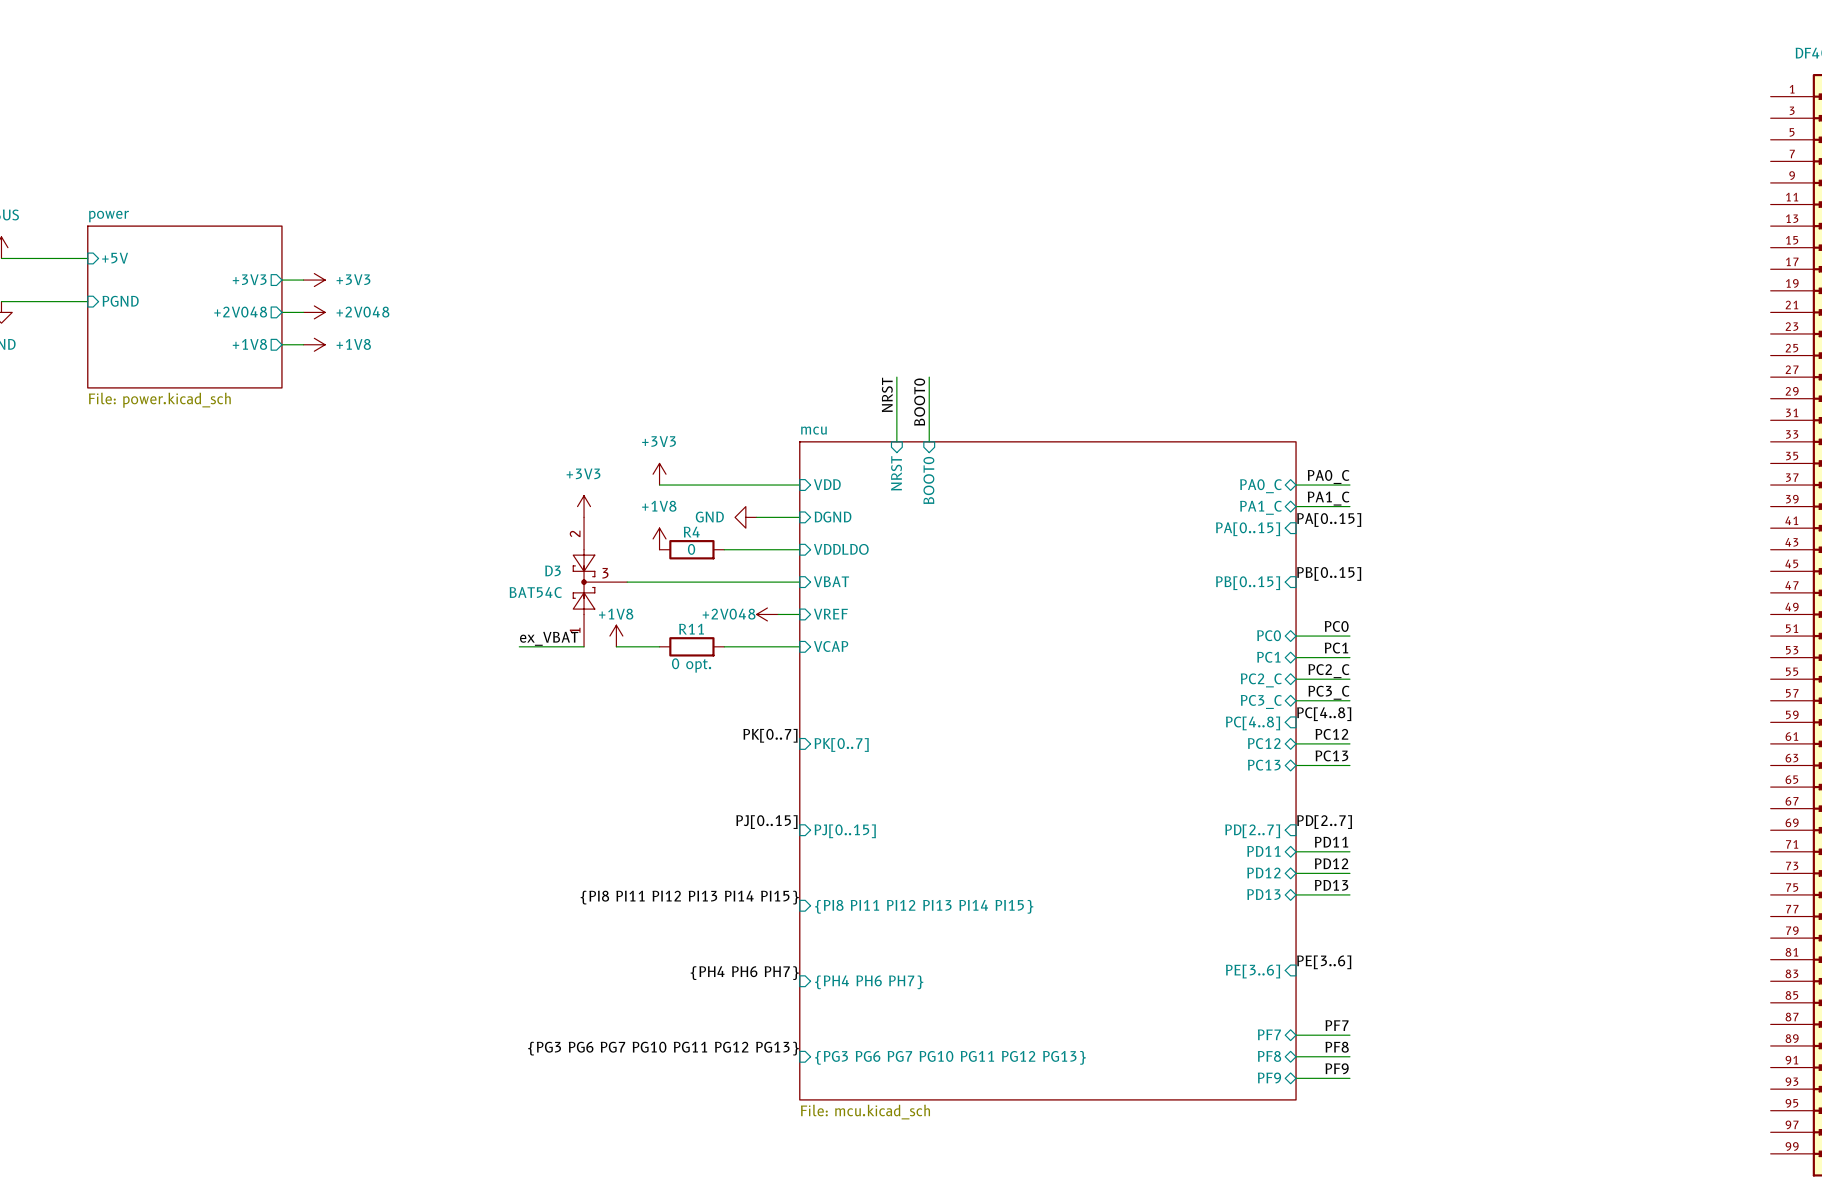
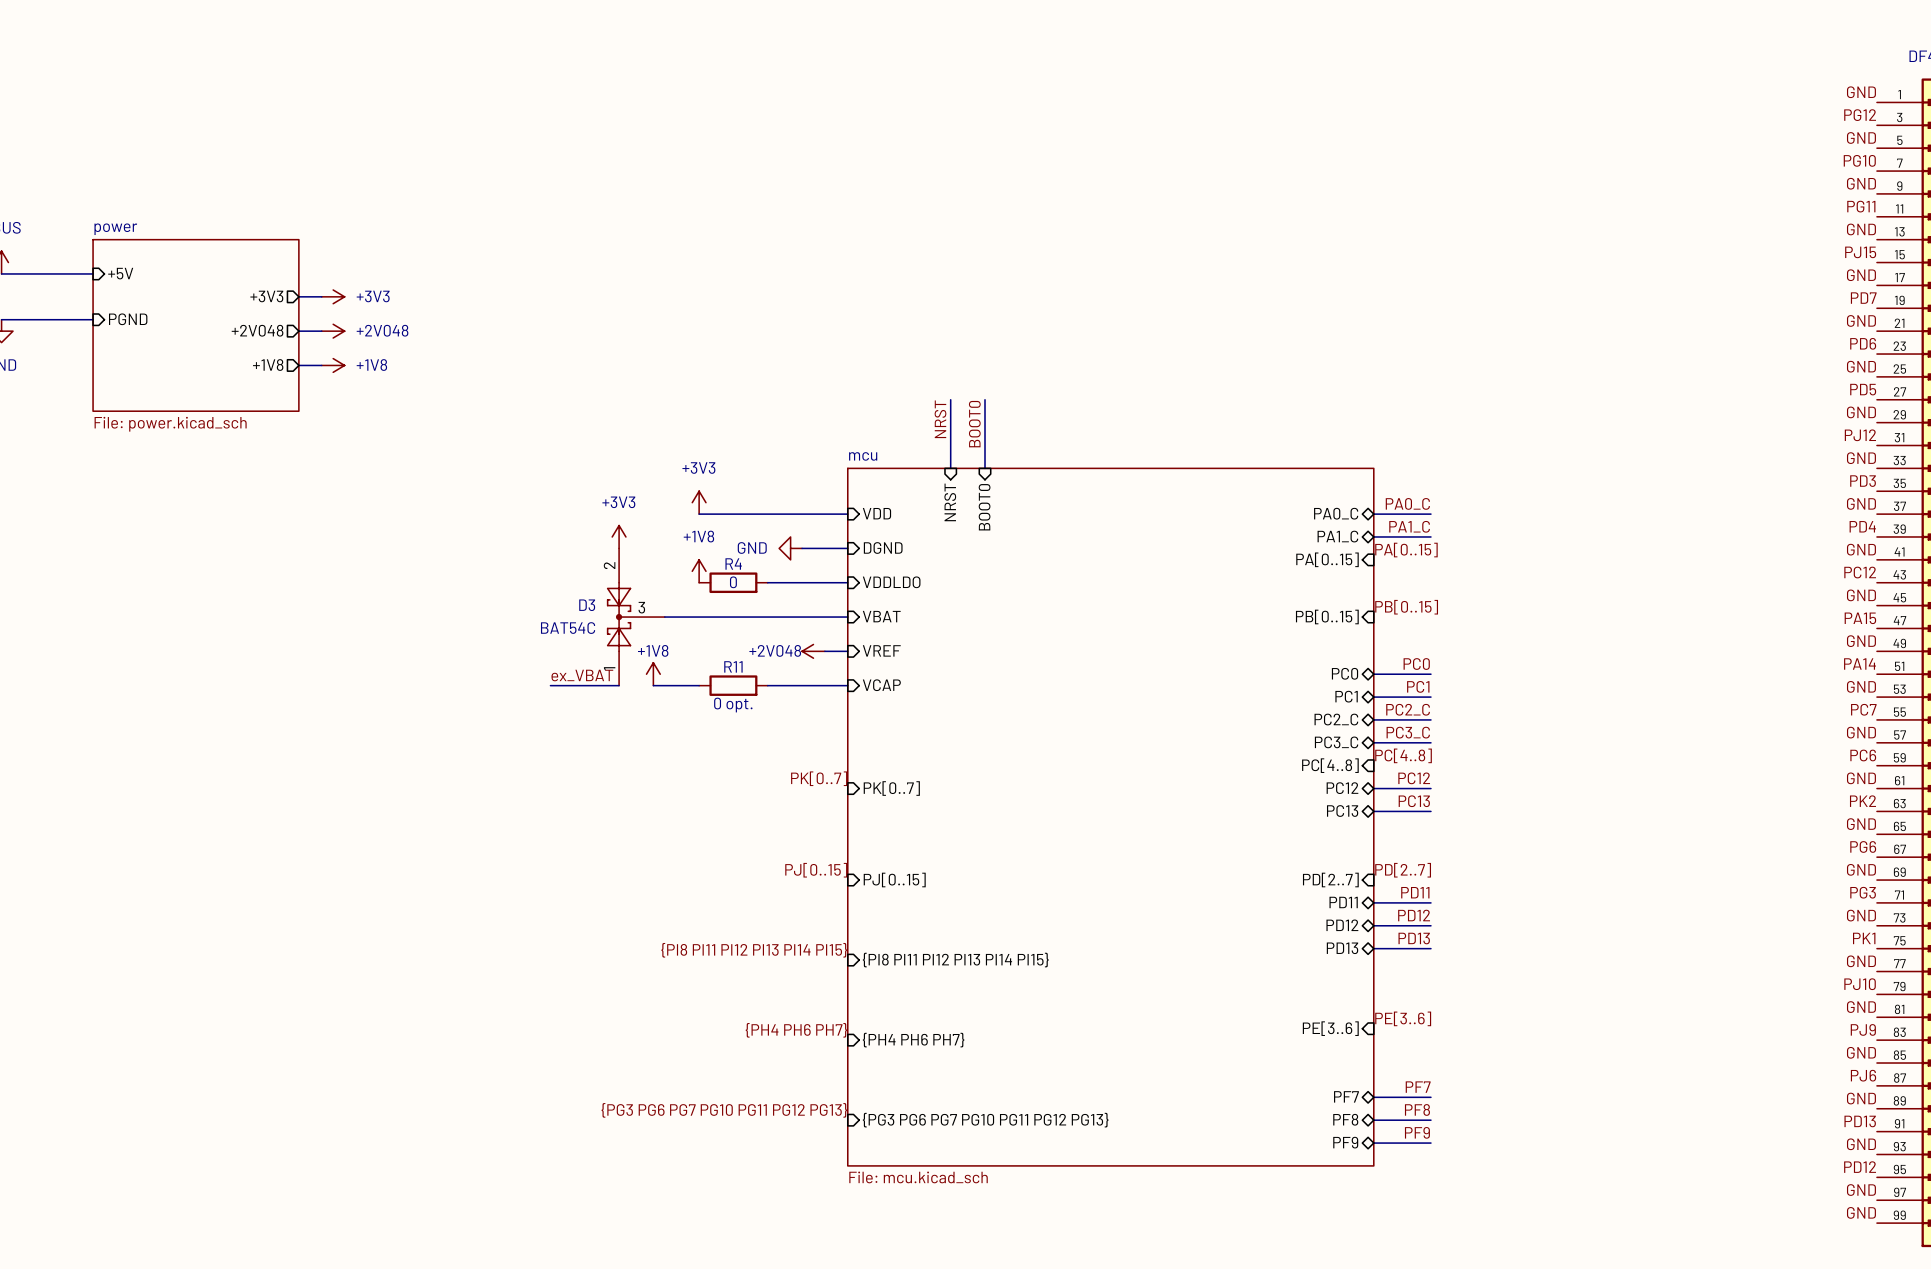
label: none -> GND (1861, 92)
label: none -> PG12 (1860, 115)
label: none -> GND (1861, 137)
label: none -> PG10 (1859, 160)
label: none -> GND (1861, 183)
label: none -> PG11 (1861, 206)
label: none -> GND (1861, 229)
label: none -> PJ15 (1860, 252)
label: none -> GND (1861, 275)
label: none -> PD7 (1863, 298)
label: none -> GND (1861, 320)
label: none -> PD6 (1863, 343)
label: none -> GND (1861, 366)
label: none -> PD5 (1863, 389)
label: none -> GND (1861, 412)
label: none -> PJ12 (1860, 435)
label: none -> GND (1861, 458)
label: none -> PD3 (1863, 481)
label: none -> GND (1861, 503)
label: none -> PD4 (1862, 526)
label: none -> GND (1861, 549)
label: none -> PC12 (1860, 572)
label: none -> GND (1861, 595)
label: none -> PA15 (1860, 618)
label: none -> GND (1861, 641)
label: none -> PA14 (1860, 664)
label: none -> GND (1861, 686)
label: none -> PC7 (1863, 709)
label: none -> GND (1861, 732)
label: none -> PC6 (1863, 755)
label: none -> GND (1861, 778)
label: none -> PK2 (1862, 801)
label: none -> GND (1861, 824)
label: none -> PG6 (1863, 846)
label: none -> GND (1861, 869)
label: none -> PG3 (1863, 892)
label: none -> GND (1861, 915)
label: none -> PK1 (1864, 938)
label: none -> GND (1861, 961)
label: none -> PJ10 (1860, 984)
label: none -> GND (1861, 1007)
label: none -> PJ9 (1863, 1029)
label: none -> GND (1861, 1052)
label: none -> PJ6 (1863, 1075)
label: none -> GND (1861, 1098)
label: none -> PD13 (1860, 1121)
label: none -> GND (1861, 1144)
label: none -> PD12 (1860, 1167)
label: none -> GND (1861, 1190)
label: none -> GND (1861, 1212)

